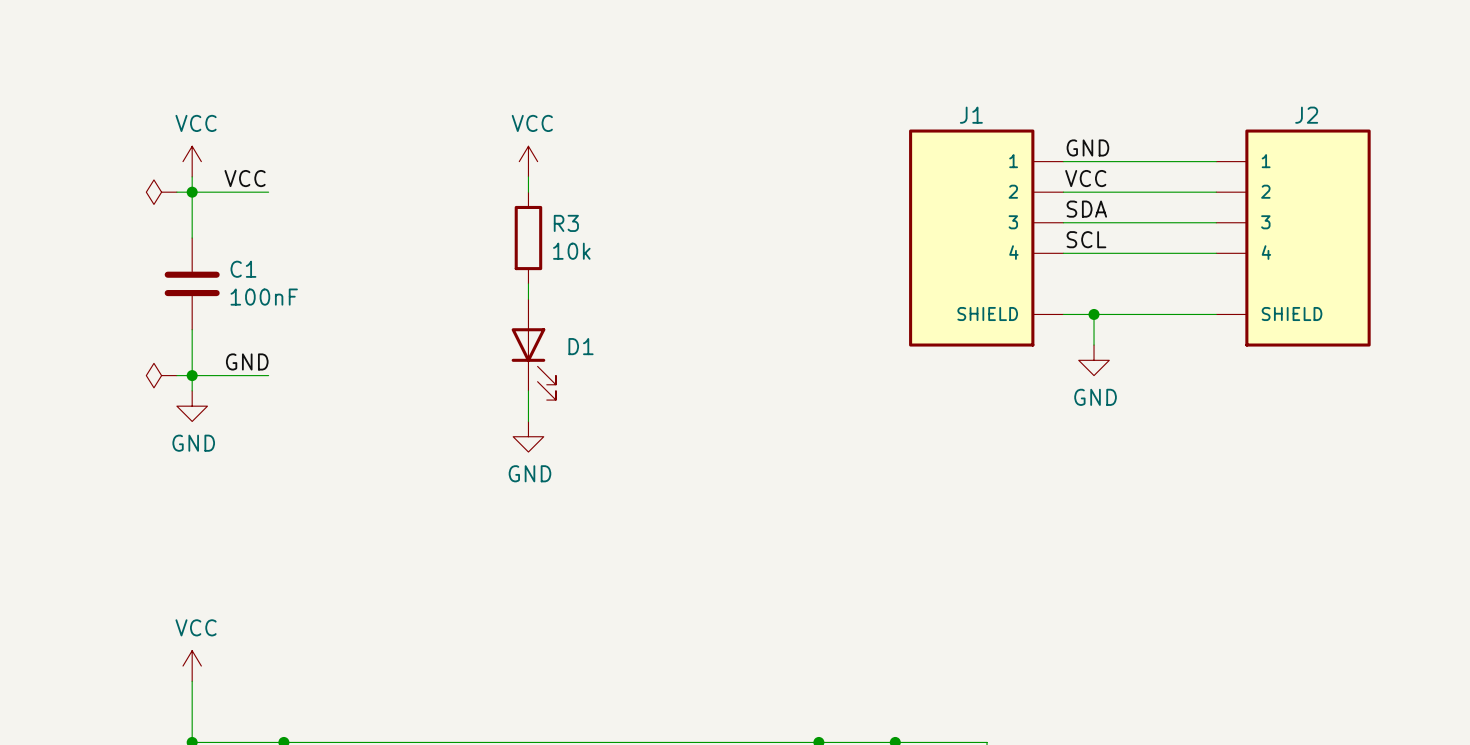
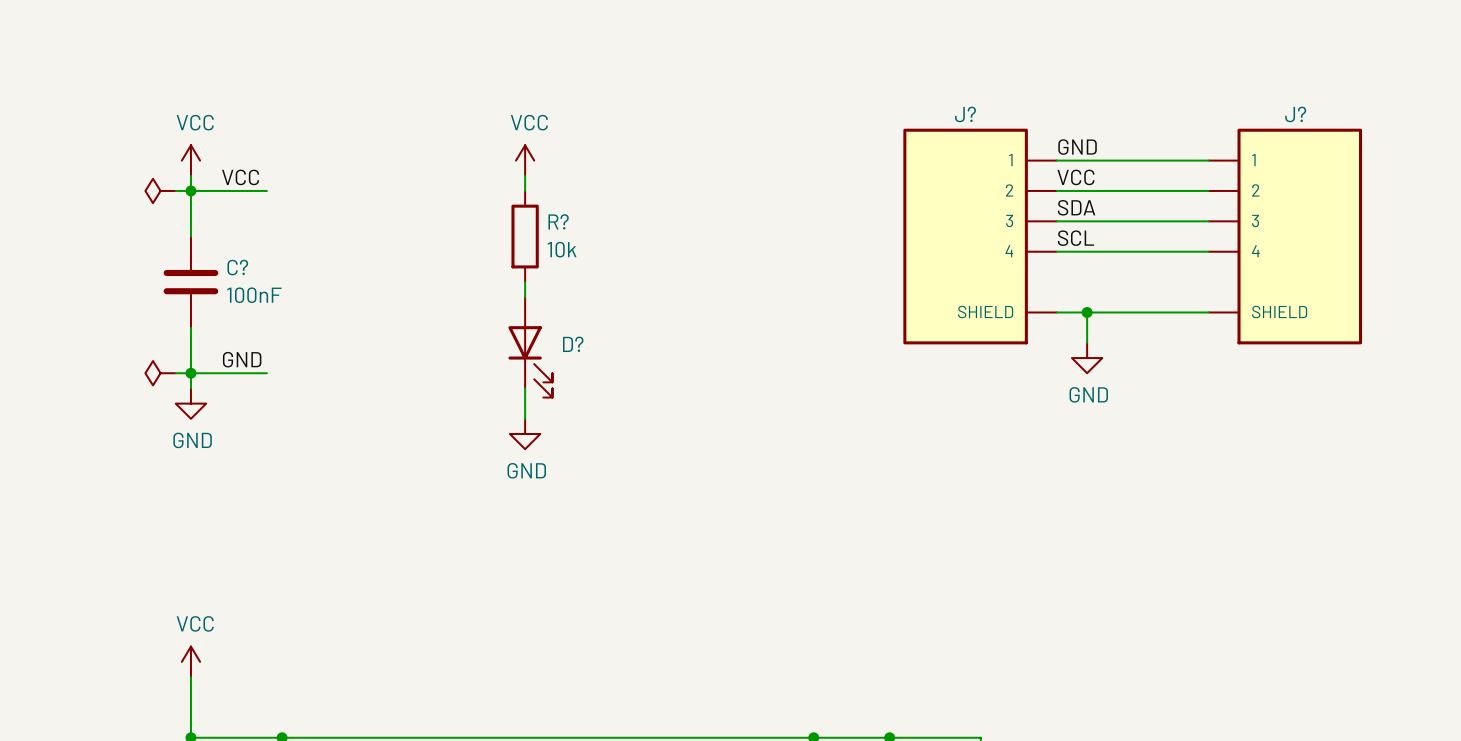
J1 name: J1 (971, 115) -> J? (965, 114)
J2 name: J2 (1306, 115) -> J? (1295, 114)
R3 name: R3 (566, 223) -> R? (558, 221)
C1 name: C1 (243, 269) -> C? (237, 267)
D1 name: D1 (581, 346) -> D? (573, 344)

